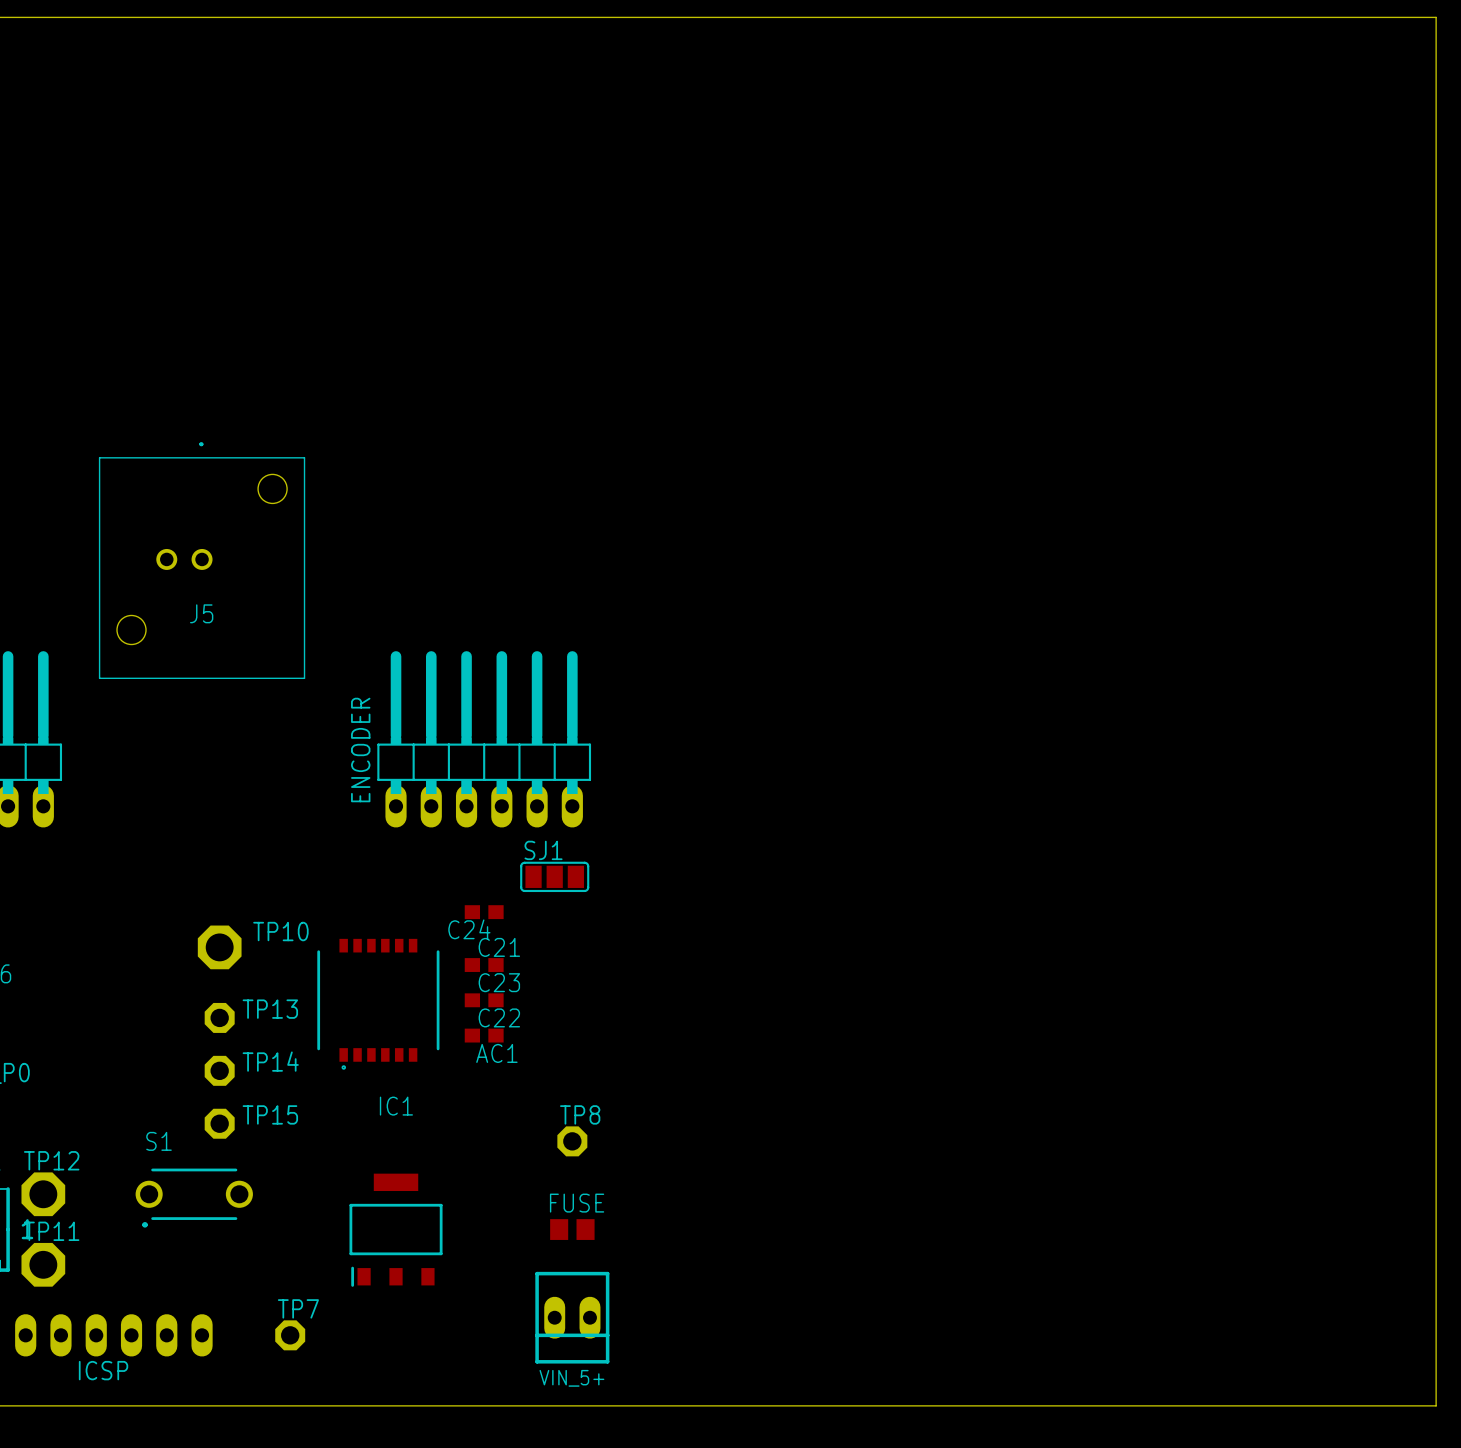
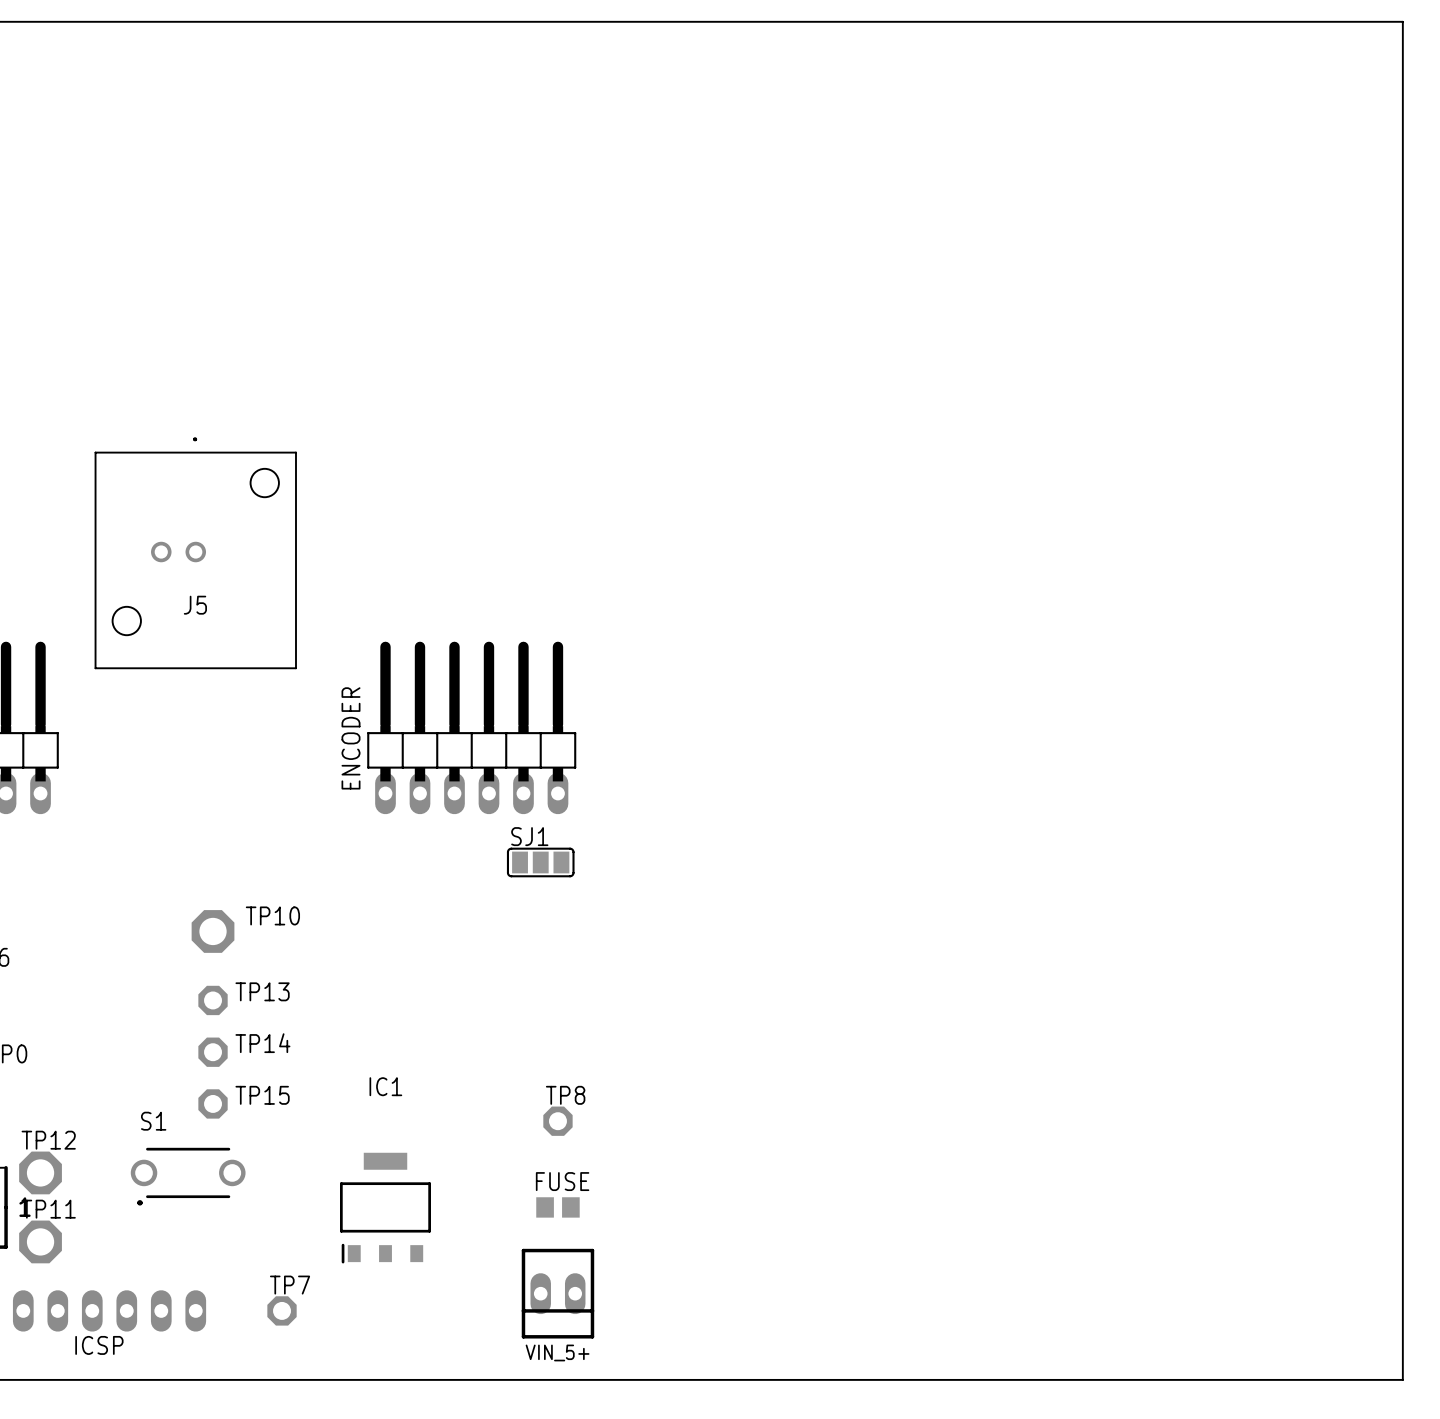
C24: (484, 912) -> none
C21: (484, 965) -> none
C23: (484, 1000) -> none
AC1: (378, 1004) -> none
C22: (484, 1035) -> none

